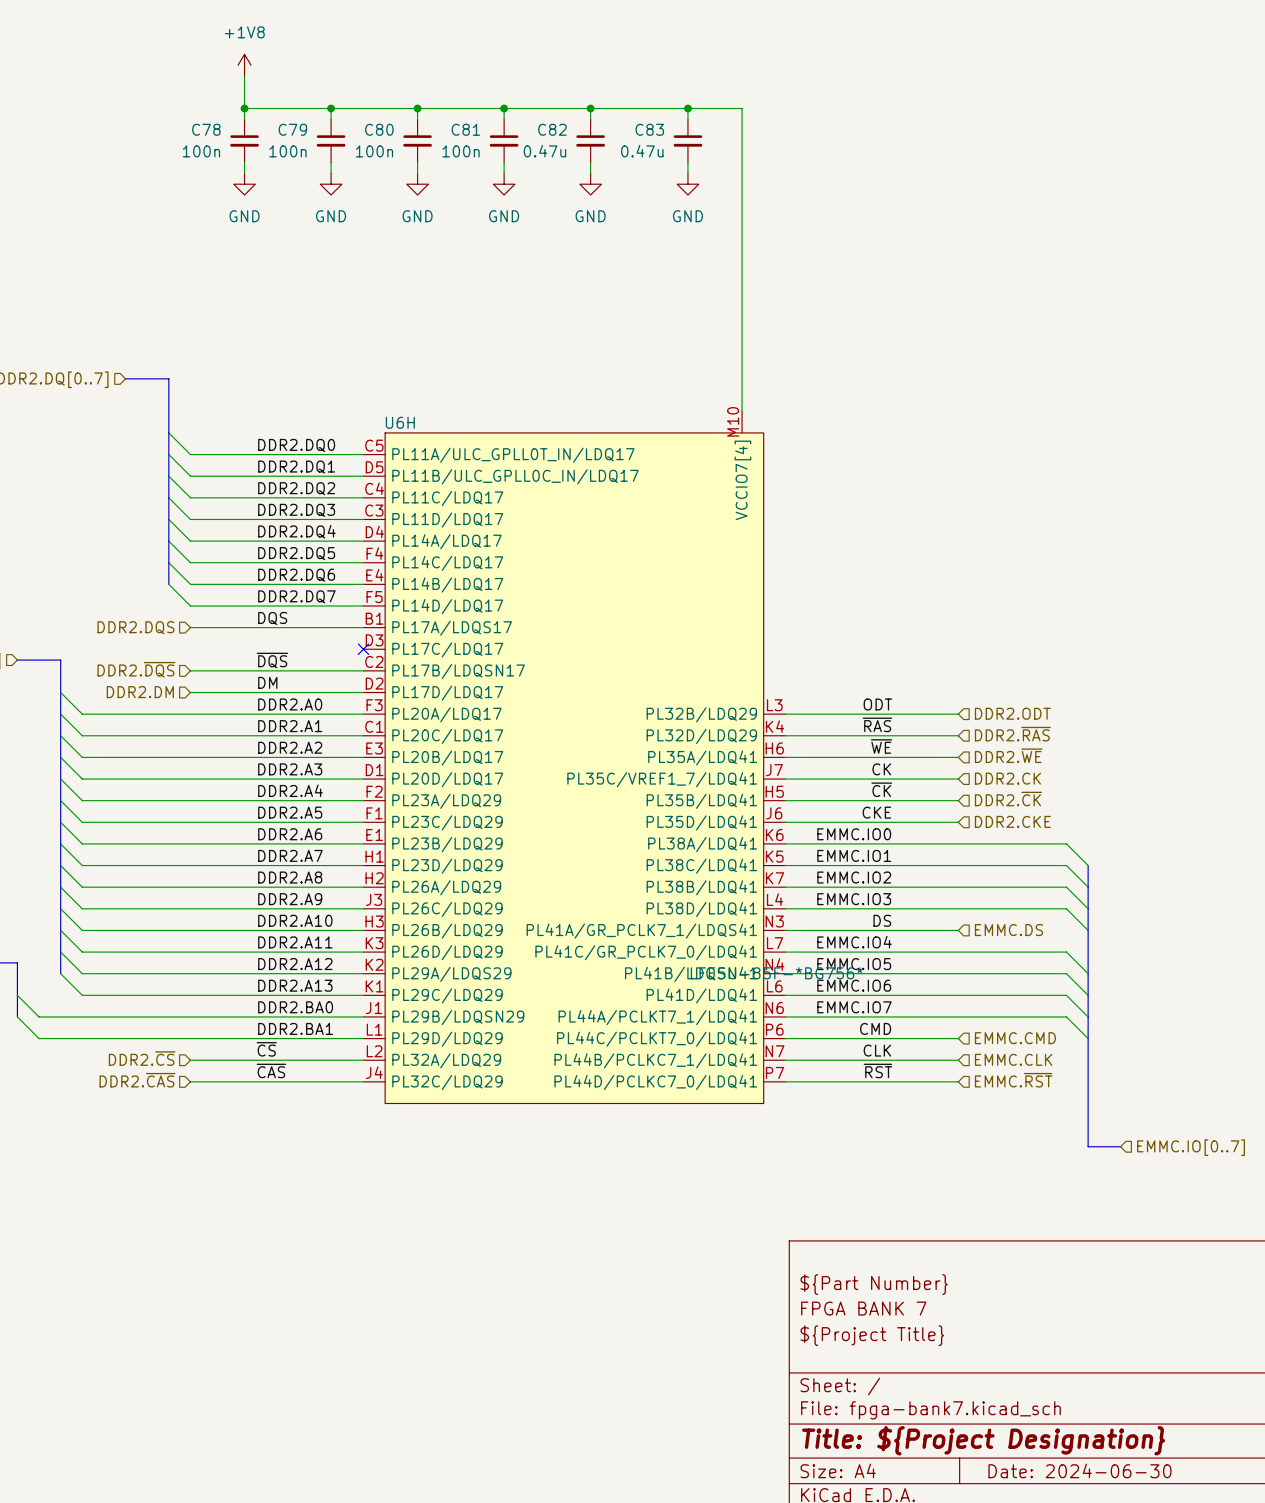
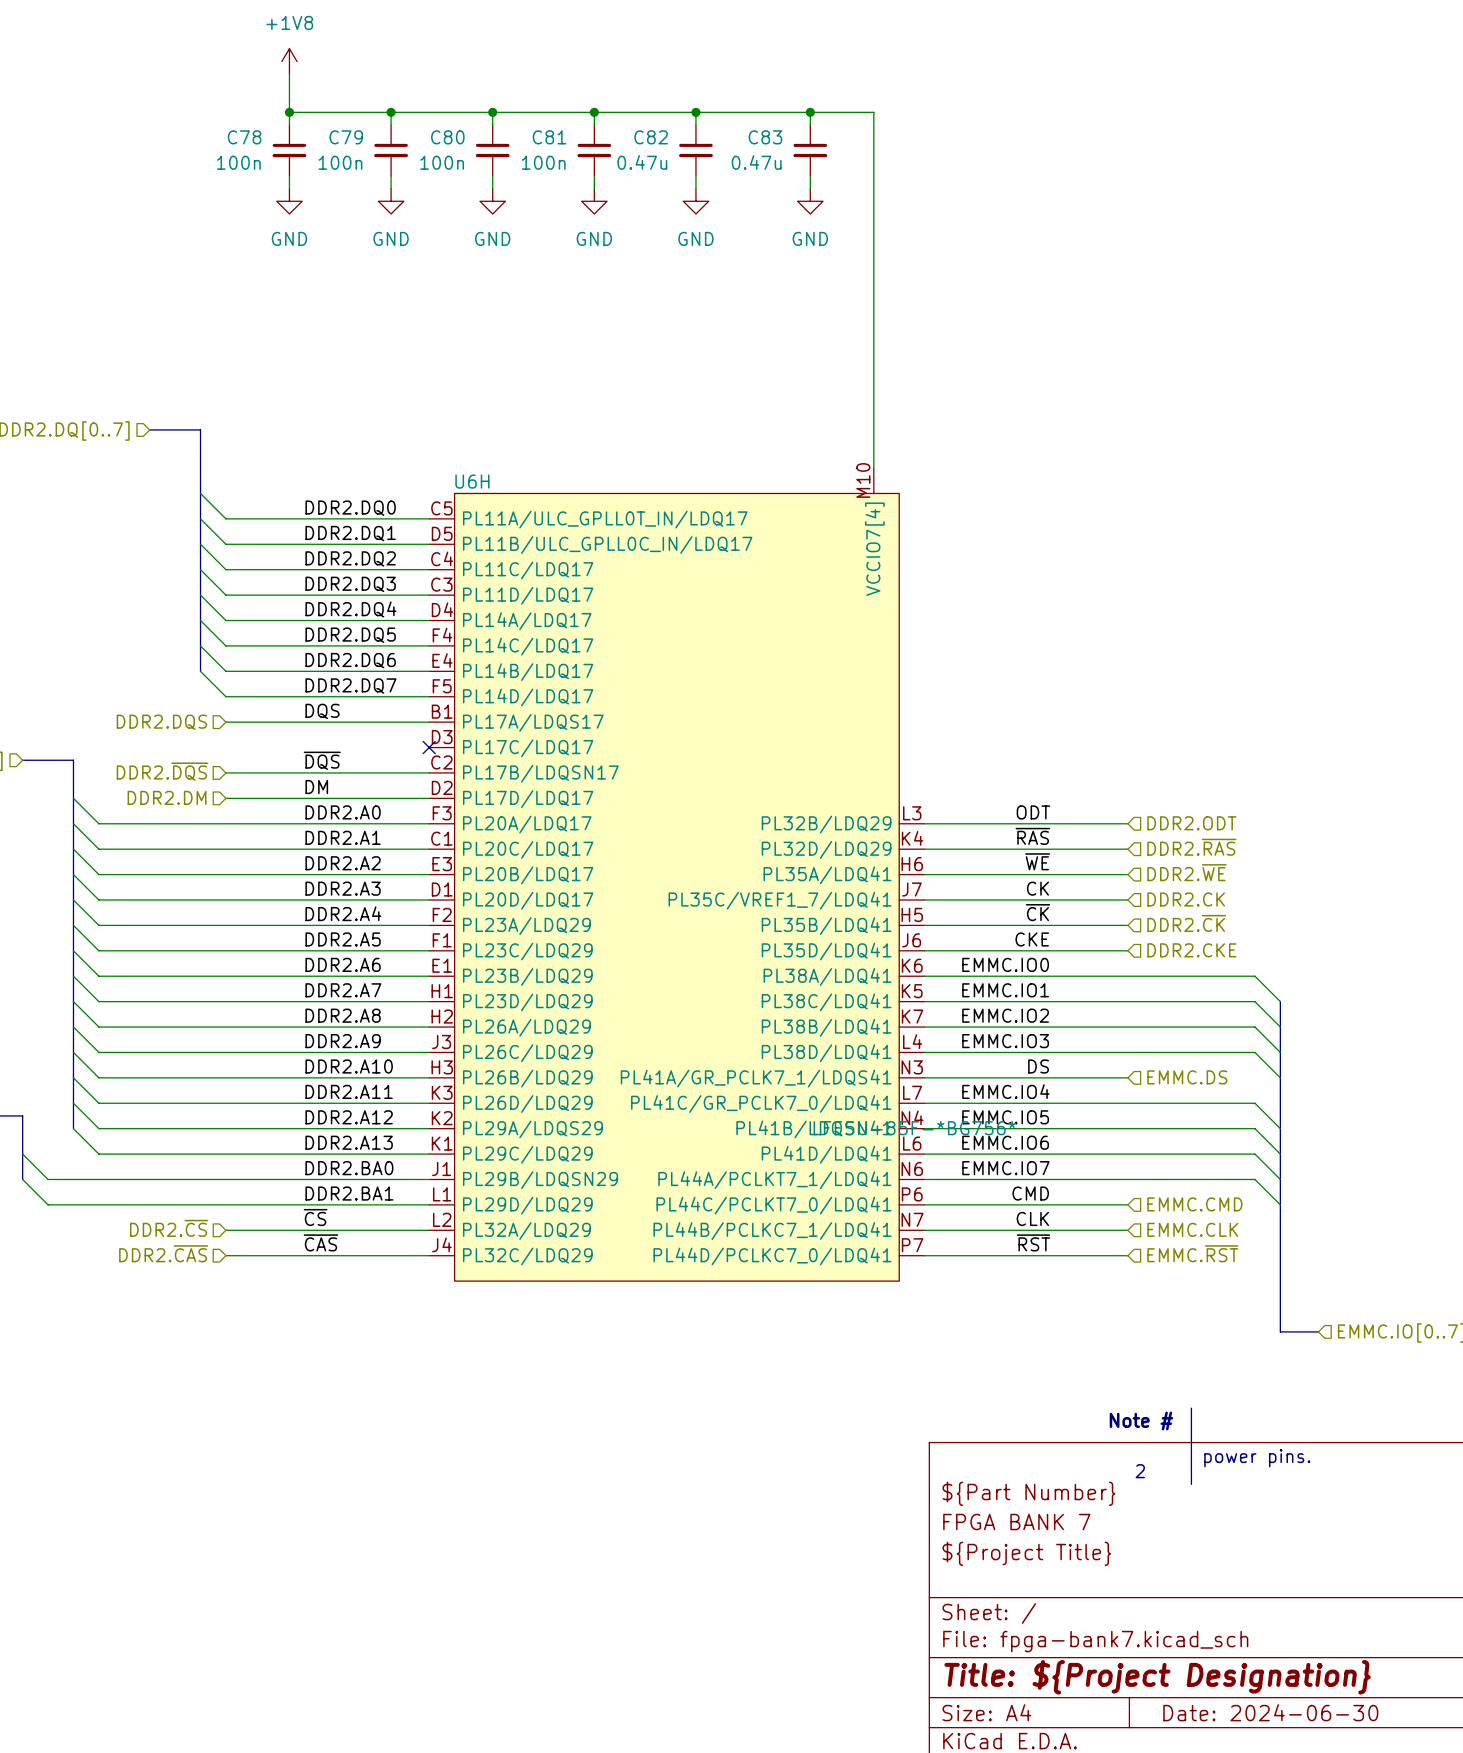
line: none -> (1191, 1408) (1191, 1484)
text: none -> Note # (1141, 1420)
text: none -> power pins. (1257, 1458)
text: none -> 2 (1140, 1471)

